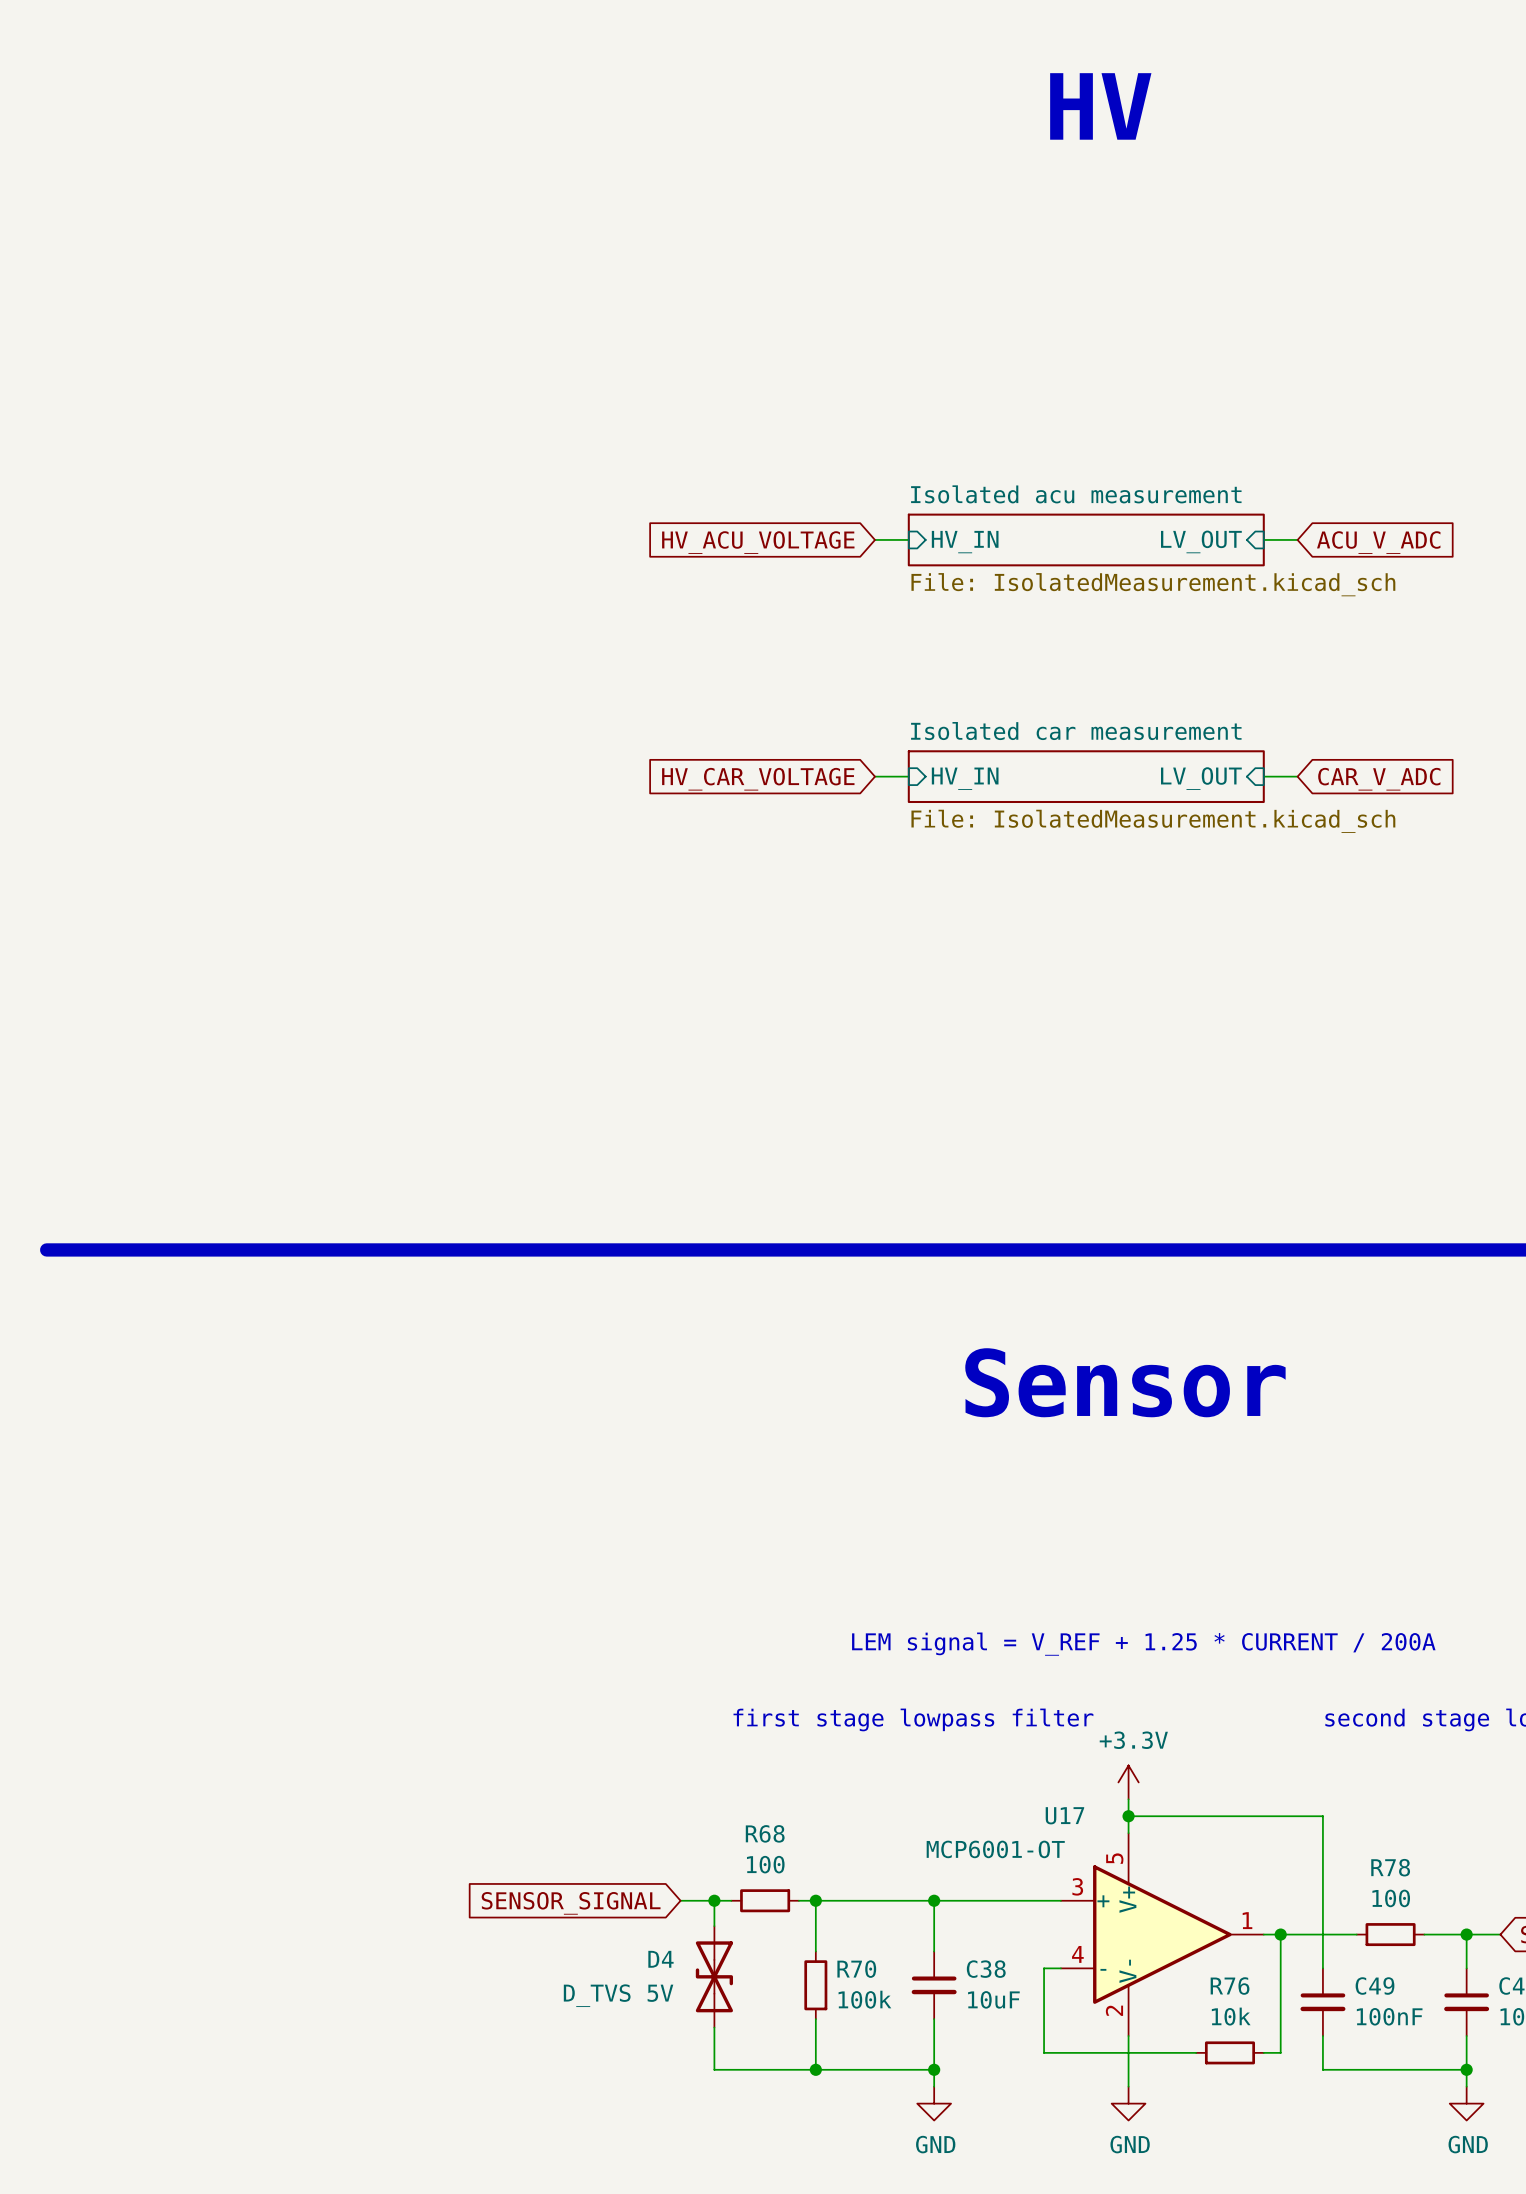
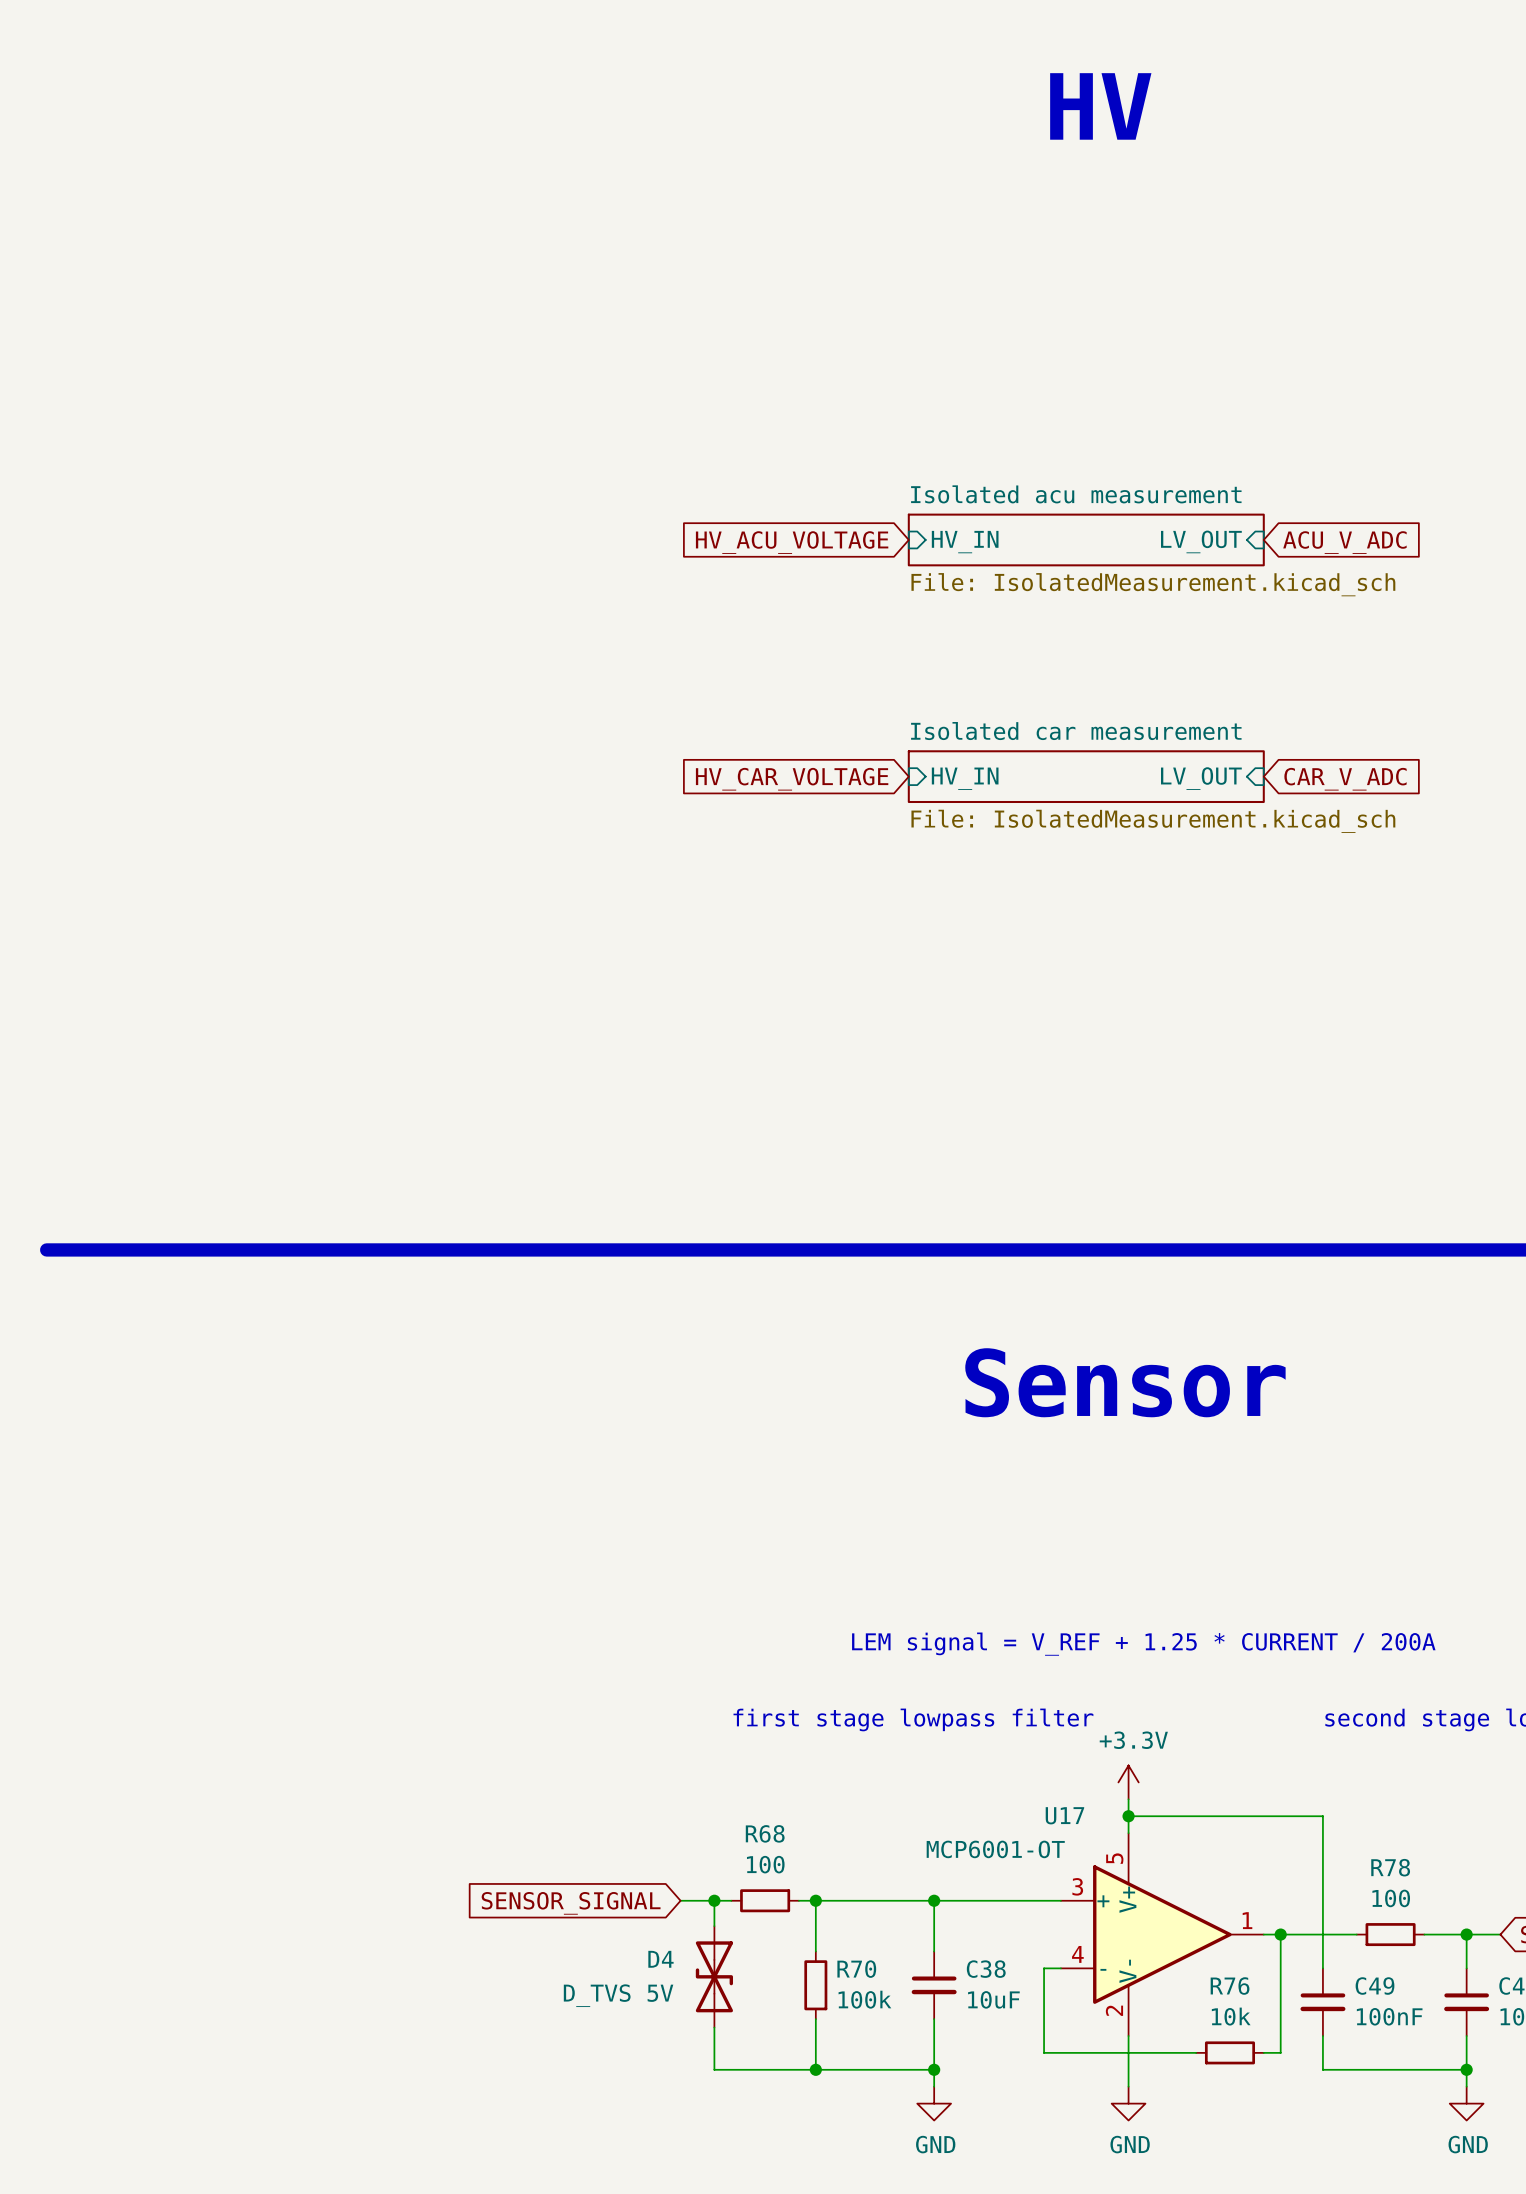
wire: (875, 539) (908, 539) -> none
wire: (1263, 539) (1297, 539) -> none
global label position: HV_ACU_VOLTAGE (758, 542) -> HV_ACU_VOLTAGE (792, 542)
global label position: ACU_V_ADC (1378, 542) -> ACU_V_ADC (1344, 542)
wire: (875, 776) (908, 776) -> none
wire: (1263, 776) (1297, 776) -> none
global label position: HV_CAR_VOLTAGE (758, 779) -> HV_CAR_VOLTAGE (792, 779)
global label position: CAR_V_ADC (1379, 779) -> CAR_V_ADC (1345, 779)

